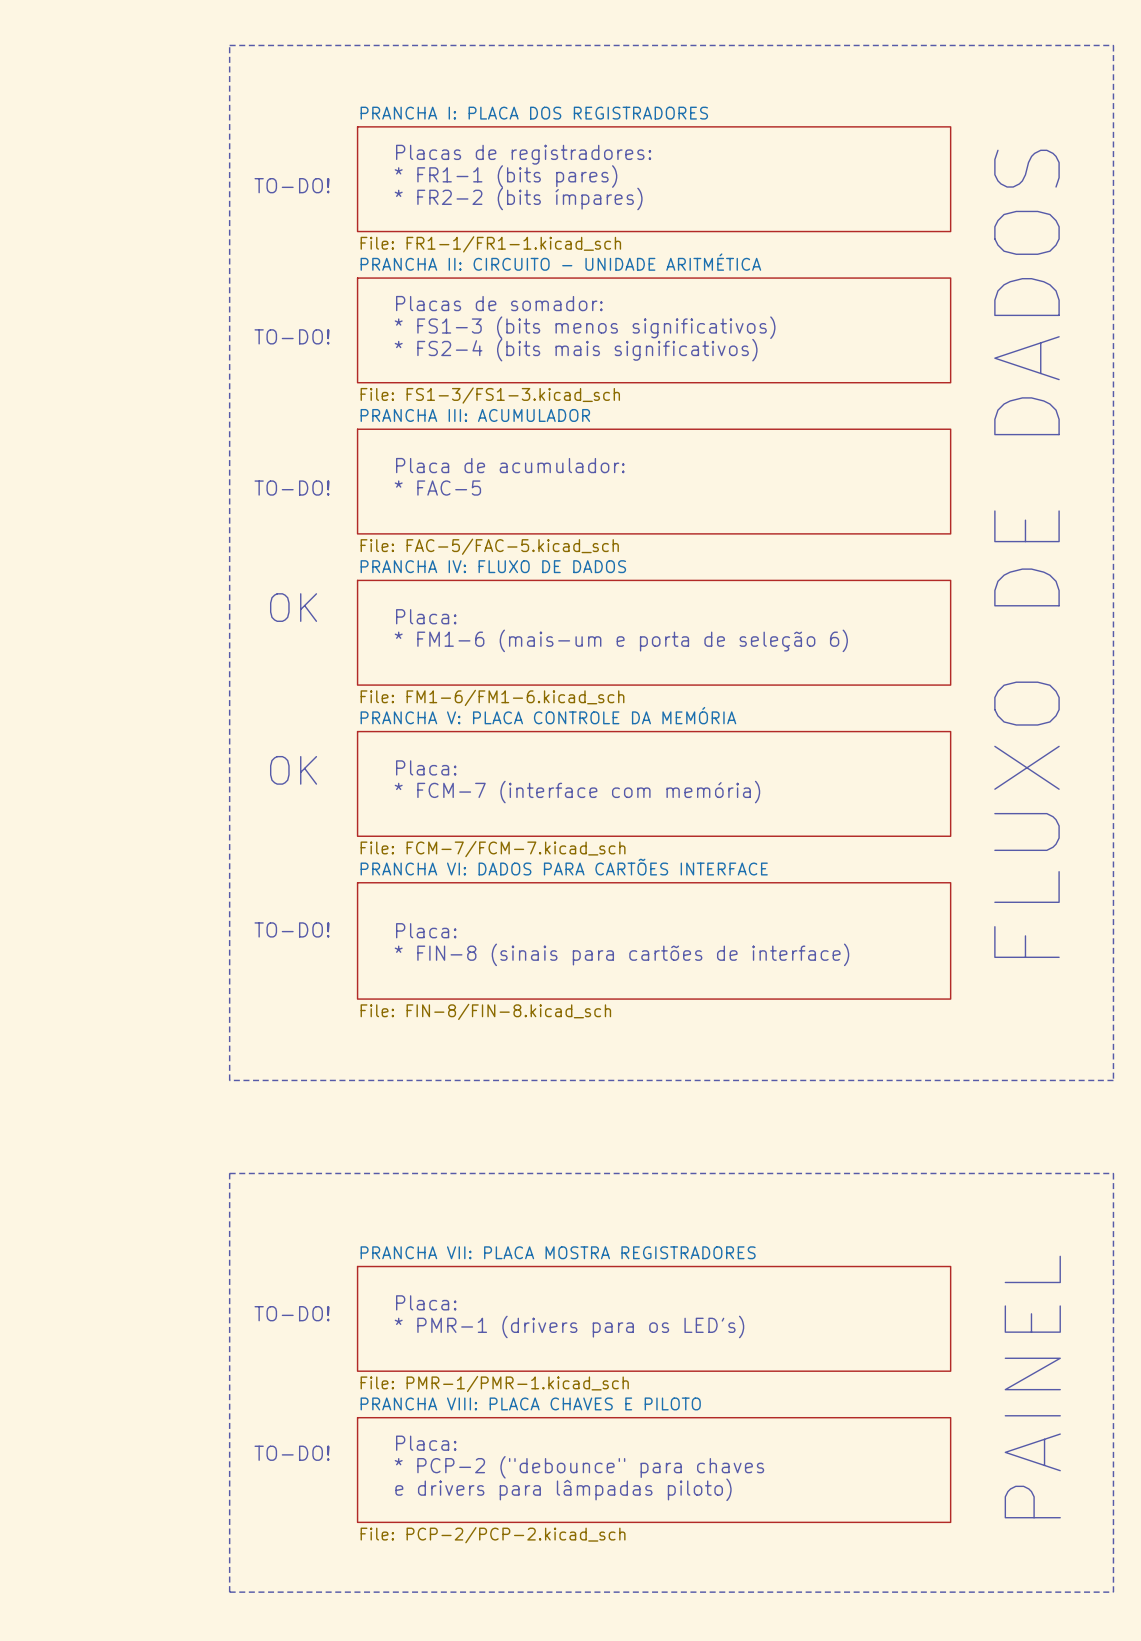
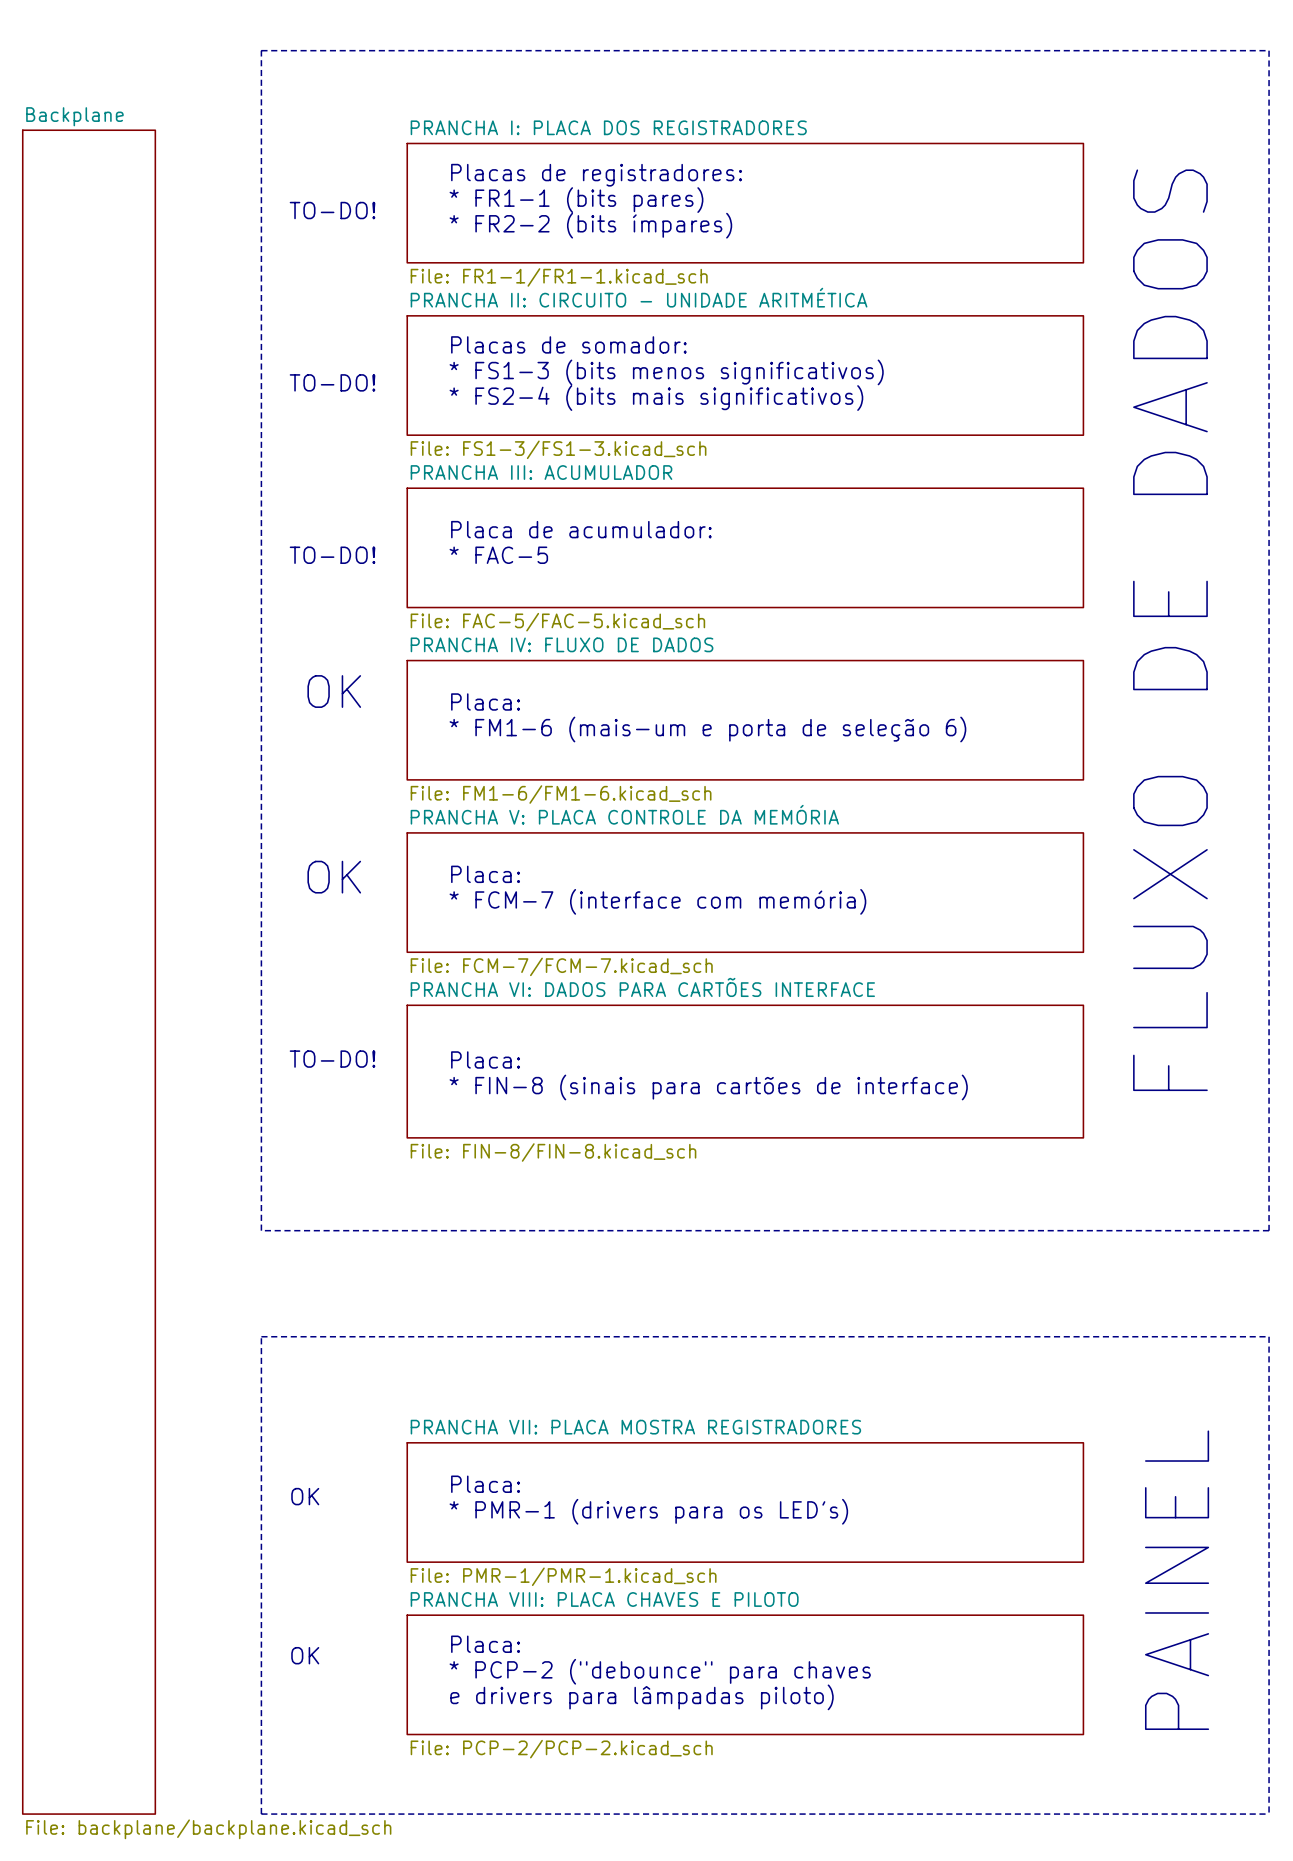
sheet Backplane: none -> File: backplane/backplane.kicad_sch (89, 972)
text: TO-DO! (292, 1313) -> OK (305, 1496)
text: TO-DO! (292, 1453) -> OK (305, 1655)

